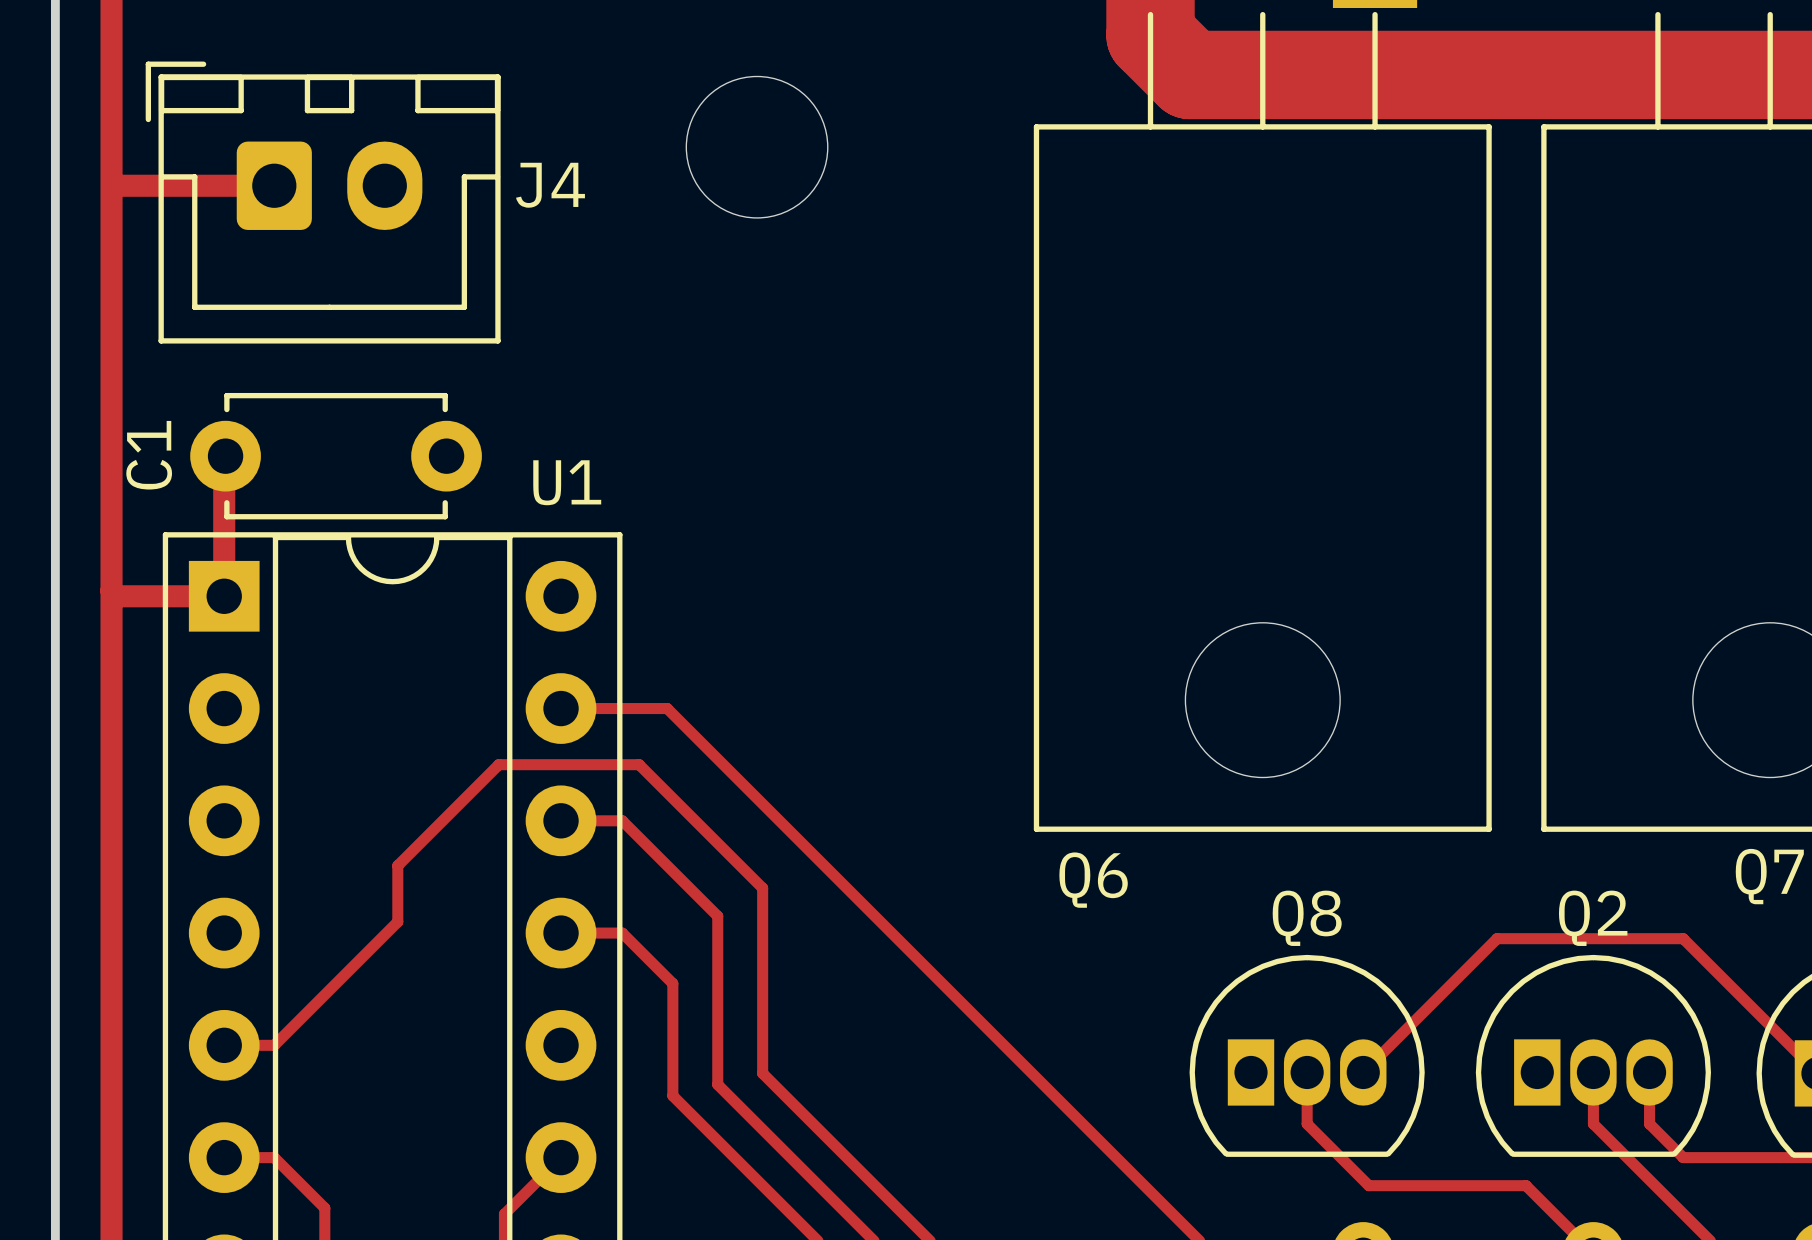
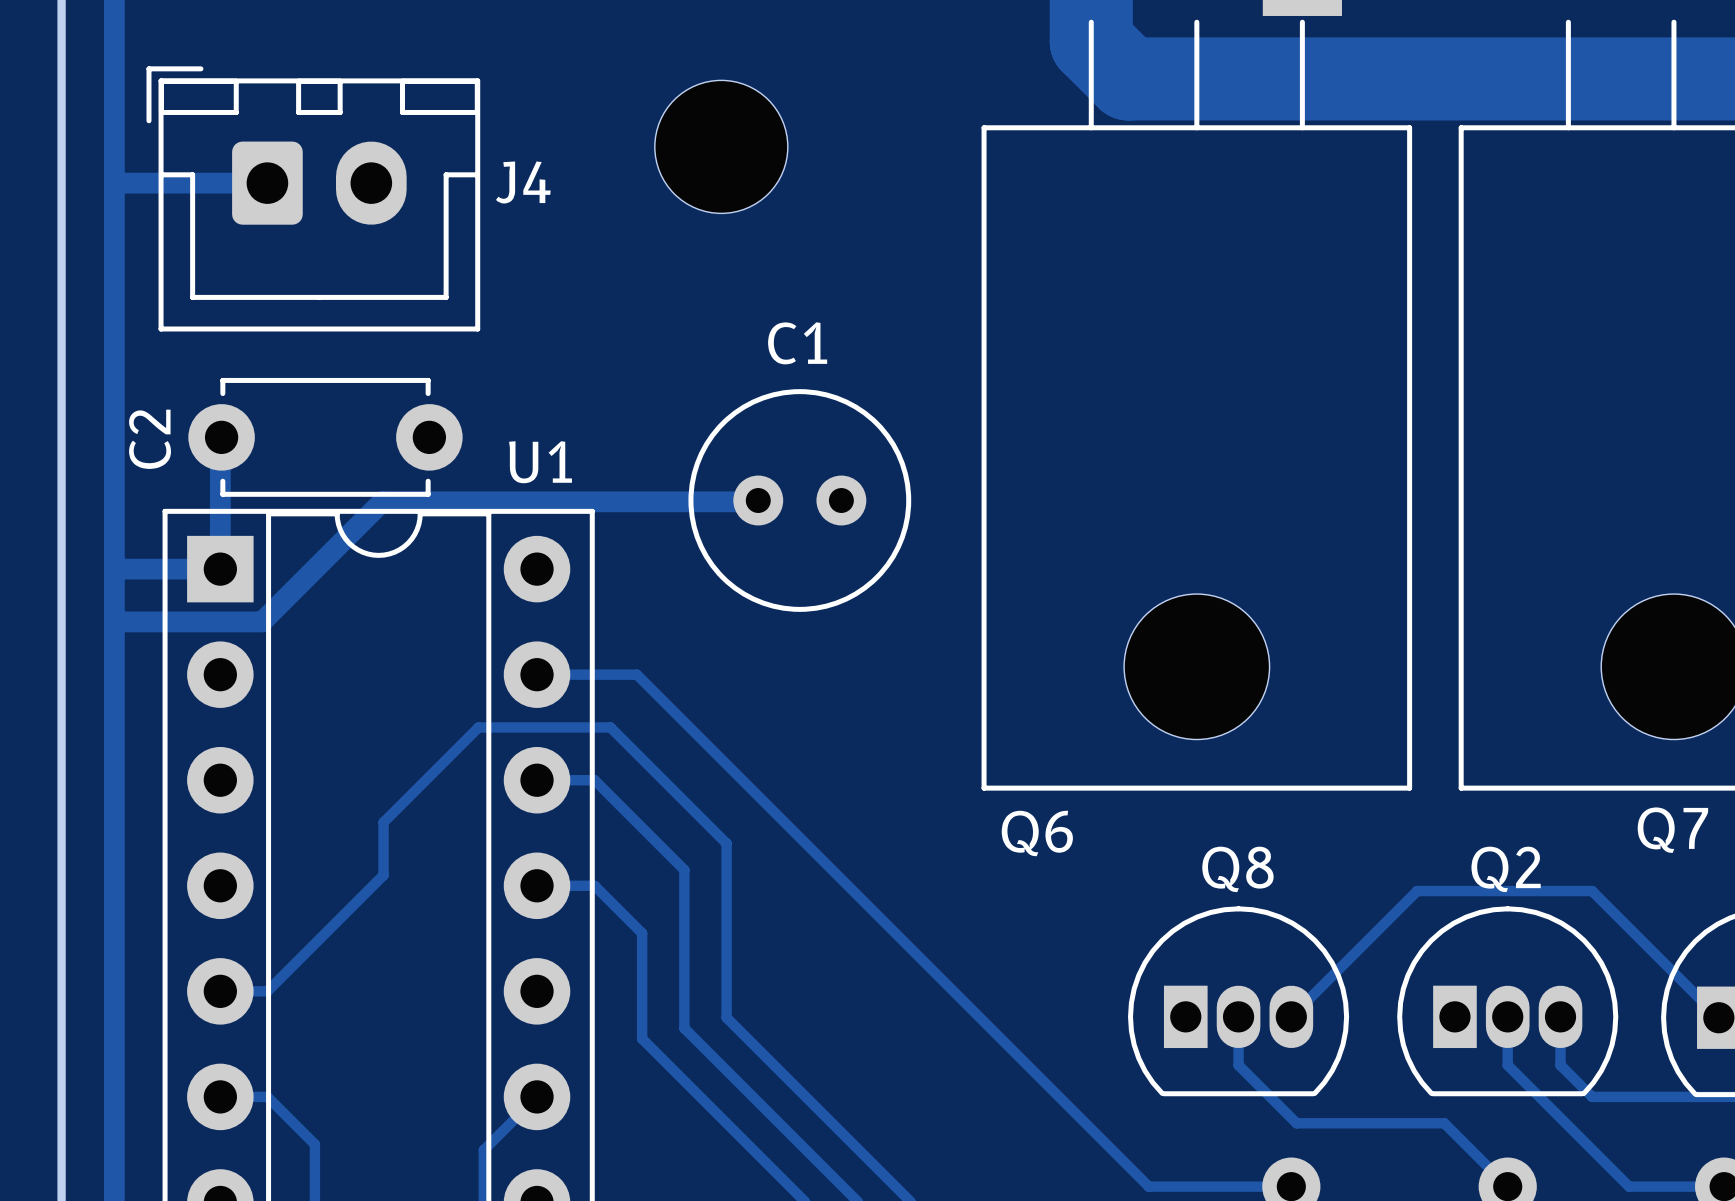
C1 name: C1 (149, 455) -> C2 (150, 439)
track: none -> (758, 500) (382, 501) (262, 621) (114, 621)
C1: none -> (799, 500)

